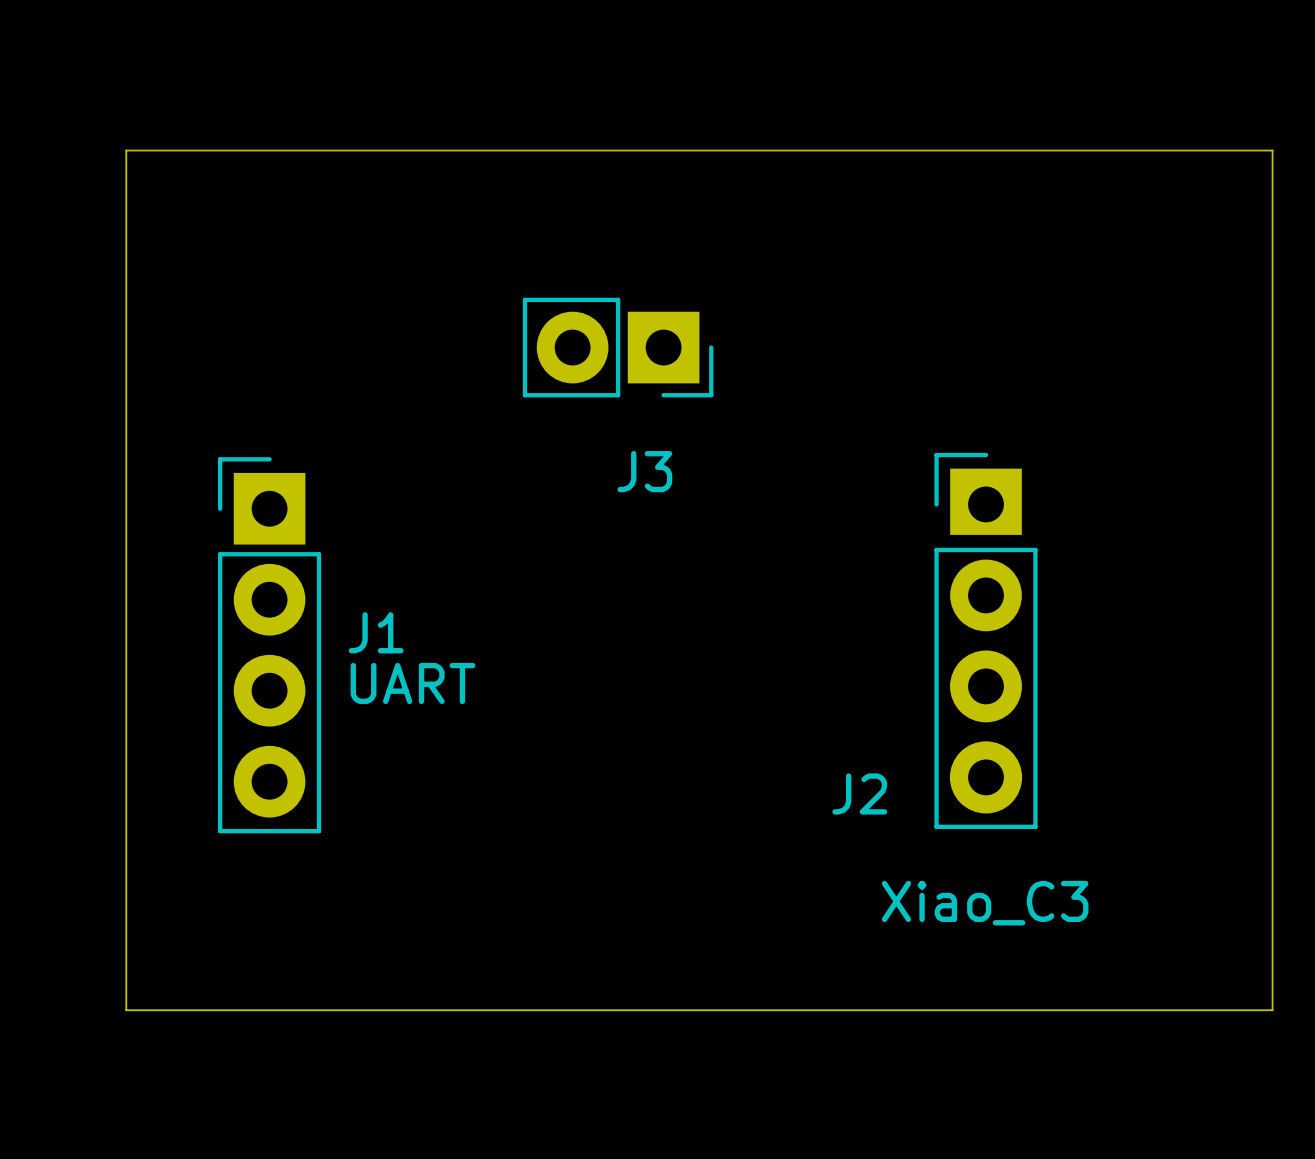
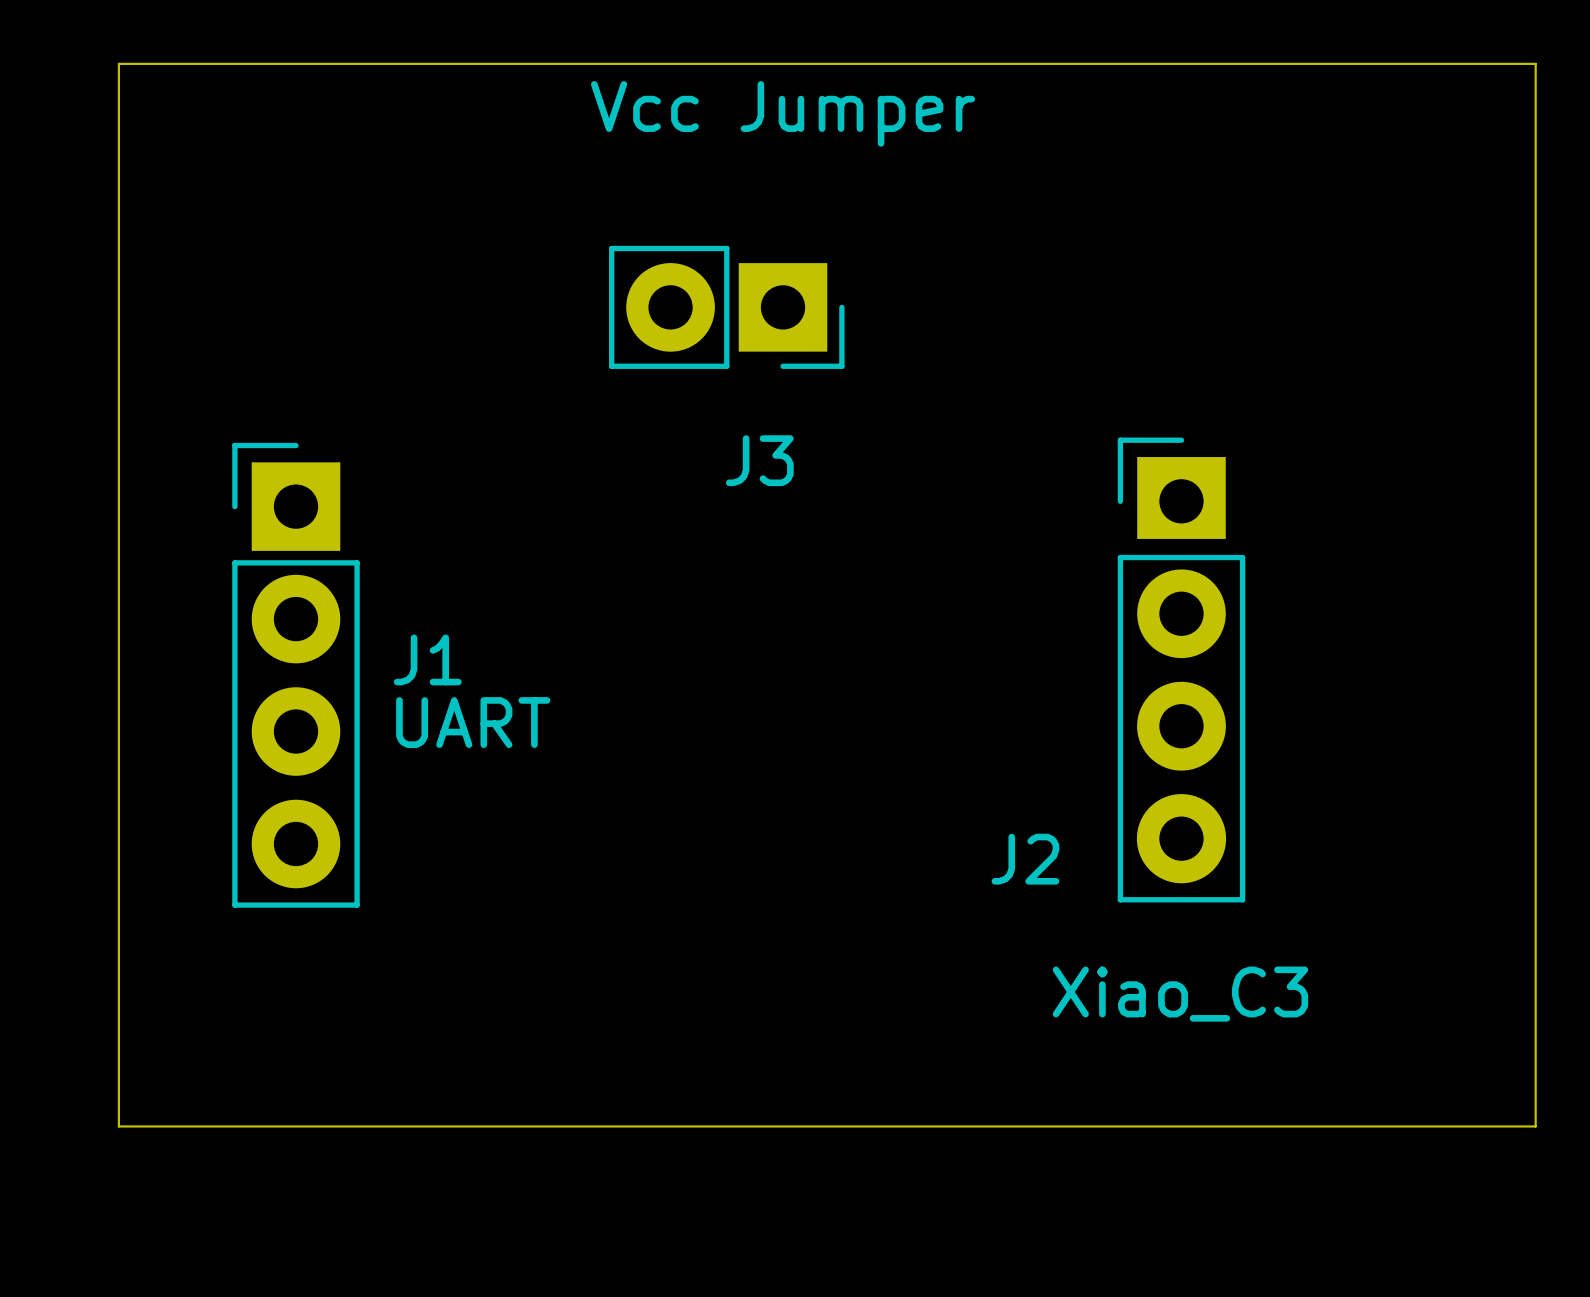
J3 value: none -> Vcc Jumper (783, 113)

